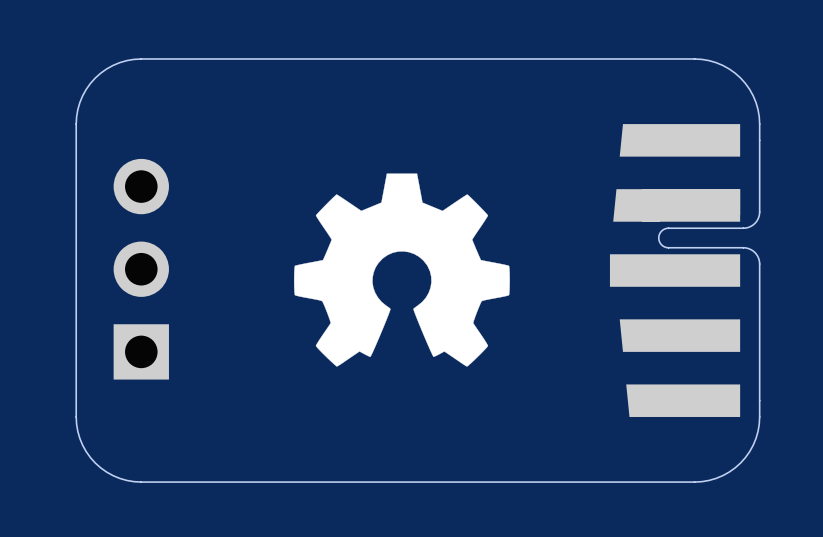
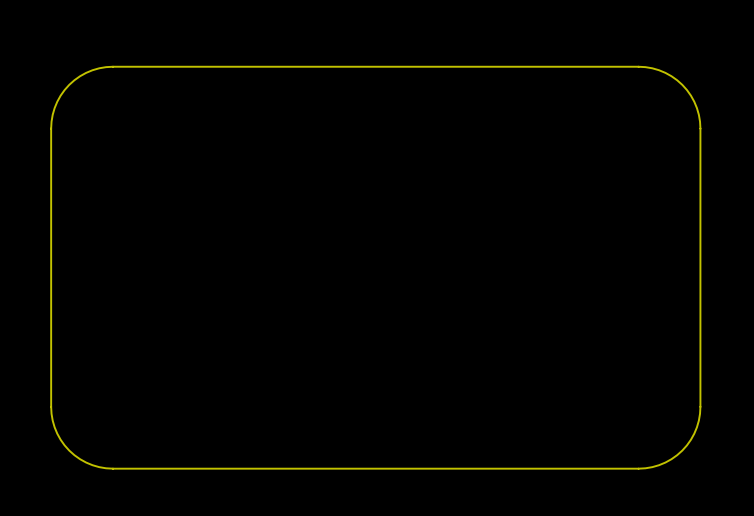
board edge: none -> (700, 144) (700, 391)
drawing: [294, 173, 510, 367] -> none
part: (141, 269) -> none
part: (685, 270) -> none

